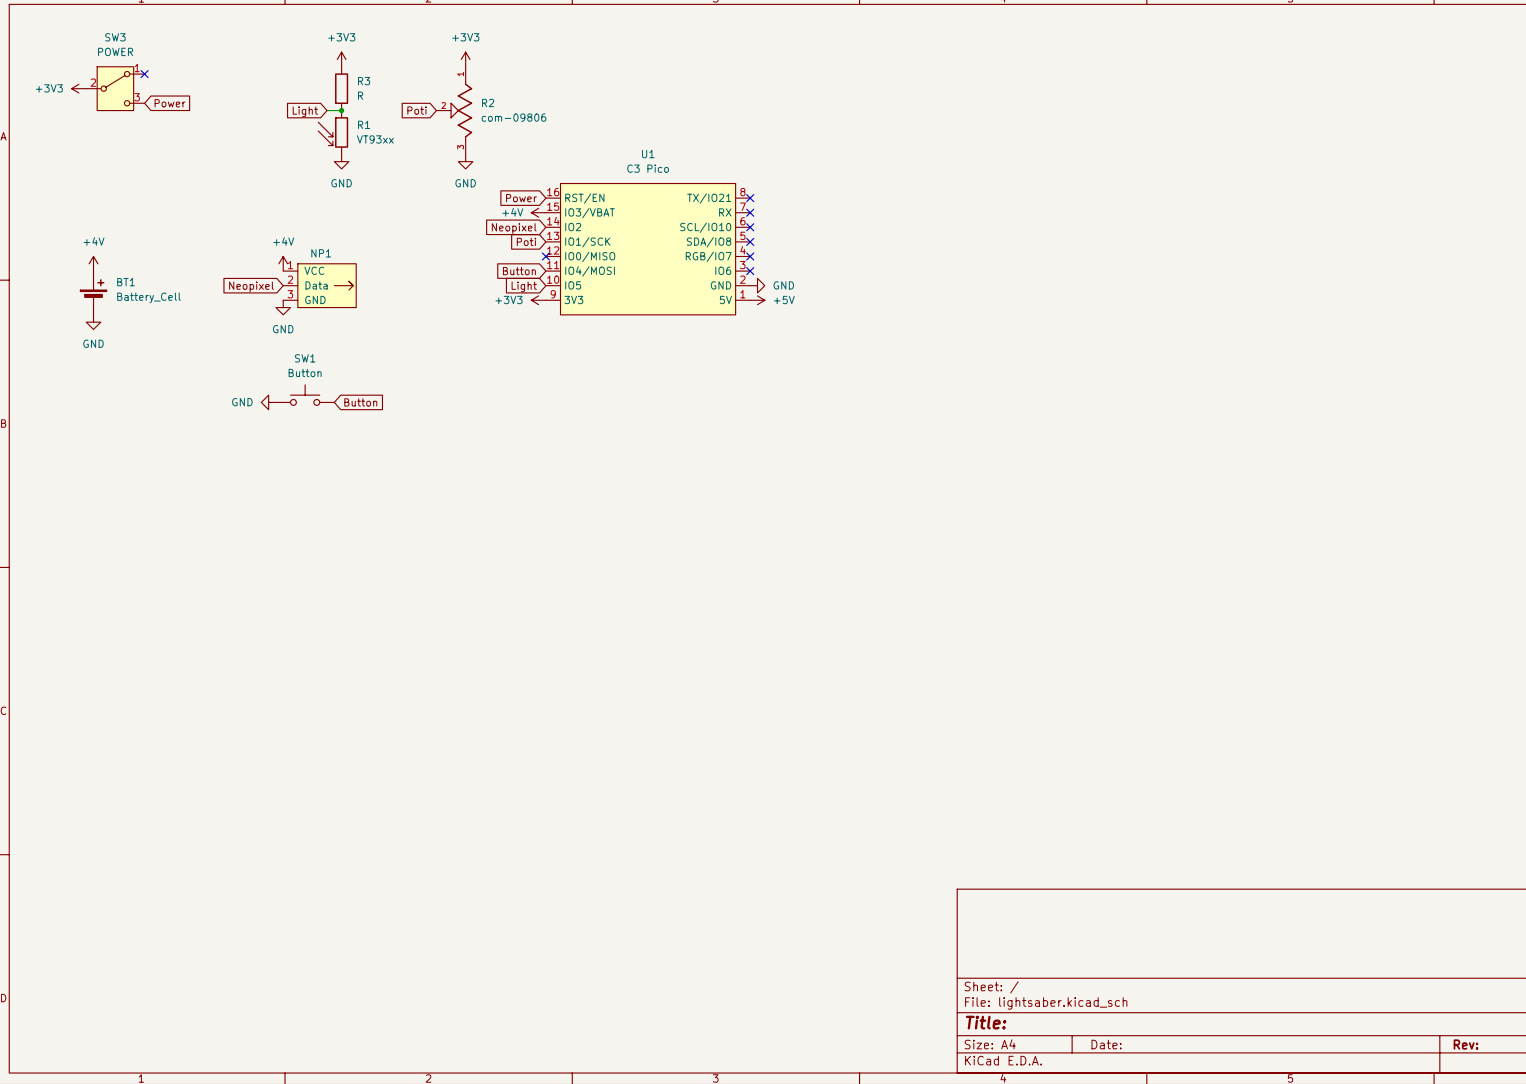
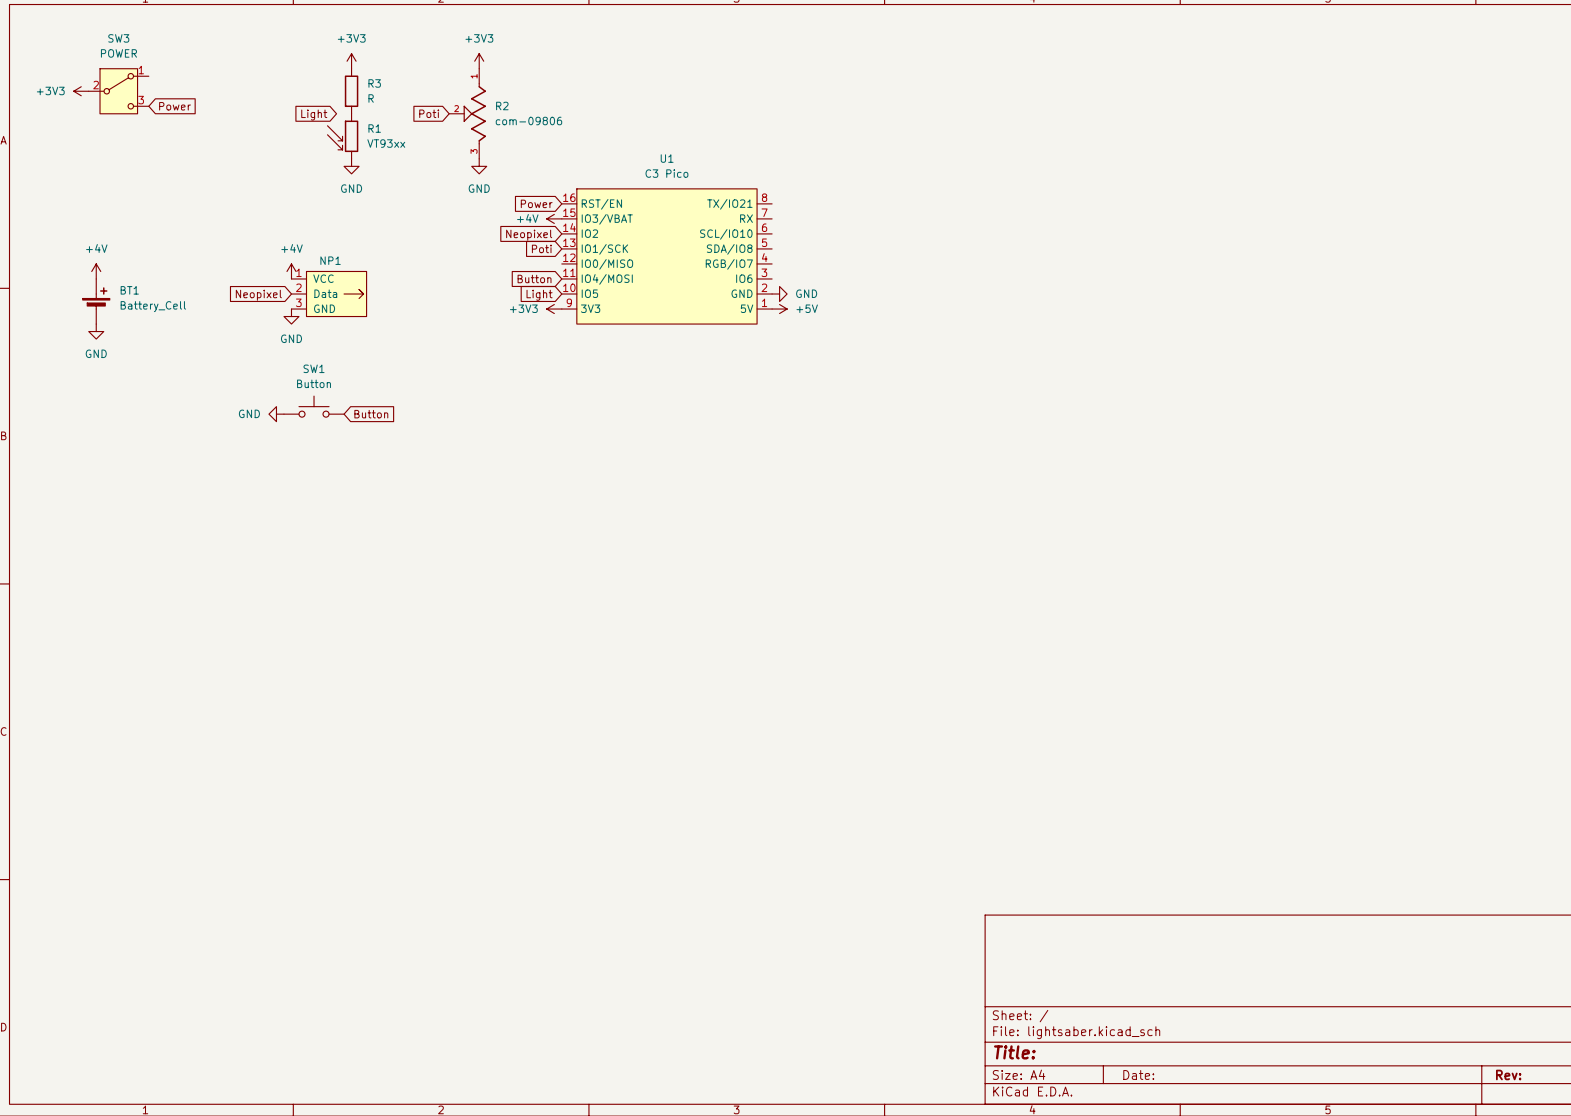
no-connect mark: (144, 74) -> none
wire: (327, 110) (341, 110) -> none
junction: (341, 110) -> none
no-connect mark: (750, 198) -> none
no-connect mark: (750, 212) -> none
no-connect mark: (750, 227) -> none
no-connect mark: (750, 241) -> none
no-connect mark: (545, 256) -> none
no-connect mark: (750, 256) -> none
no-connect mark: (750, 271) -> none

